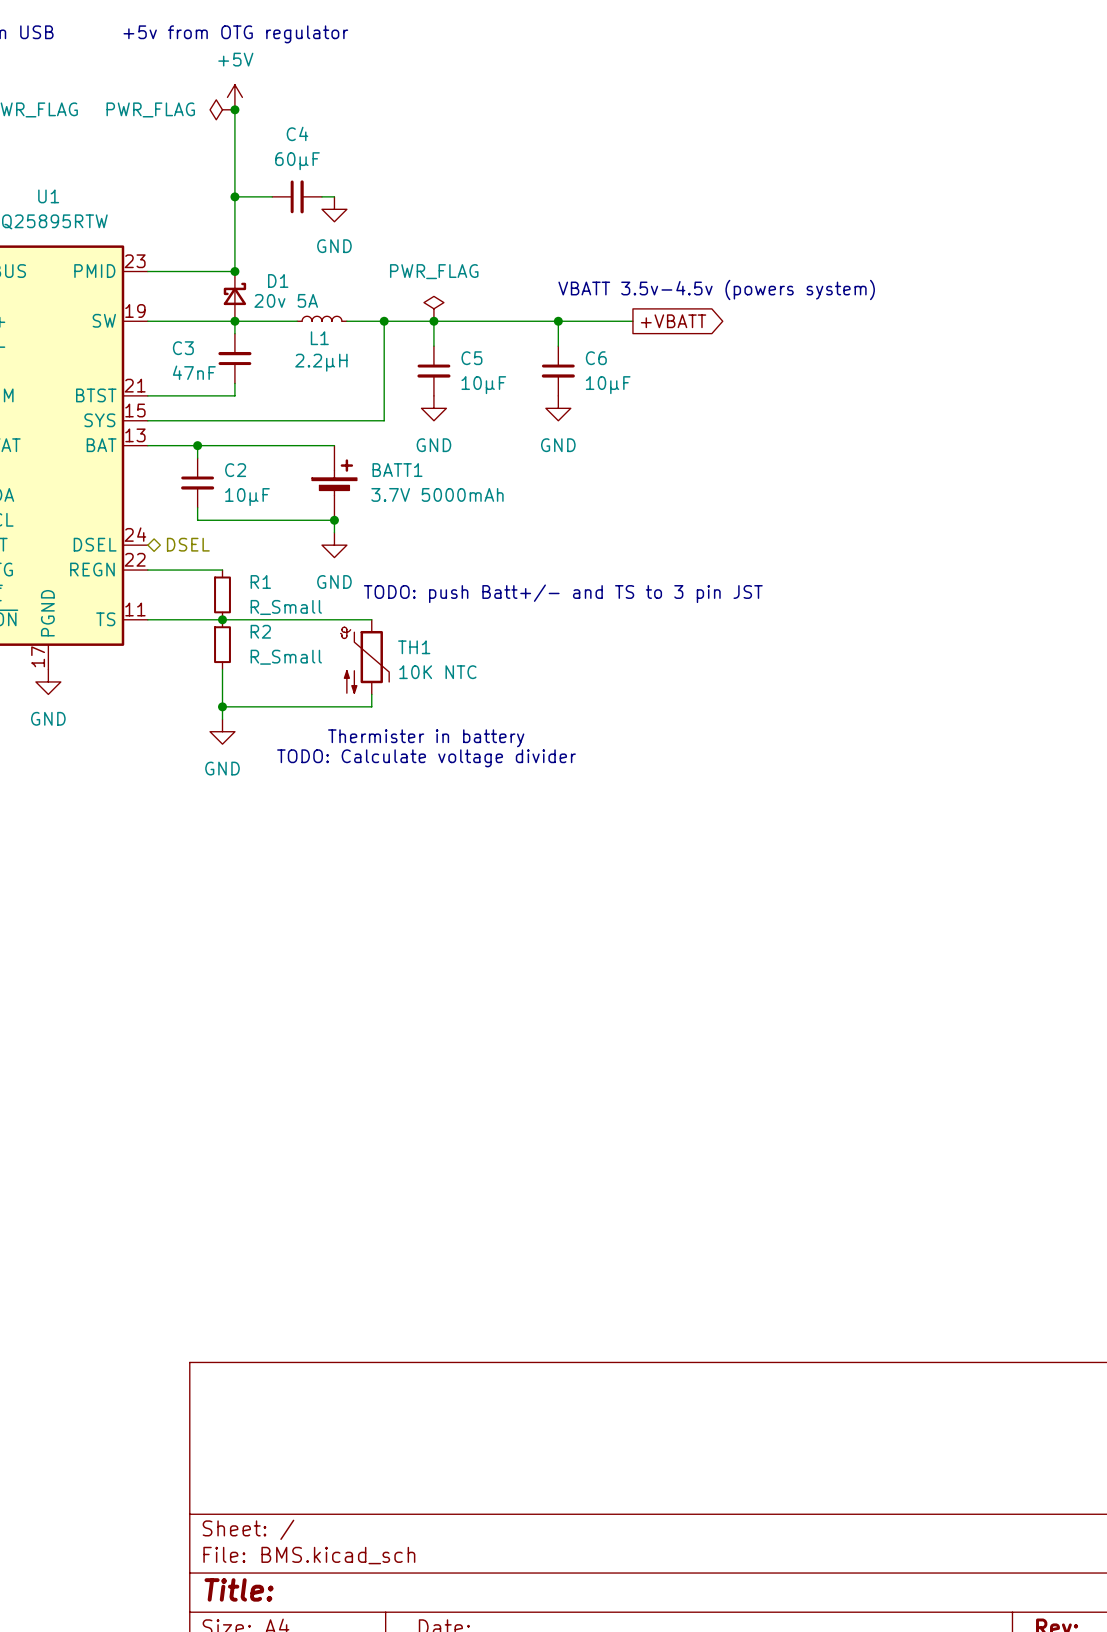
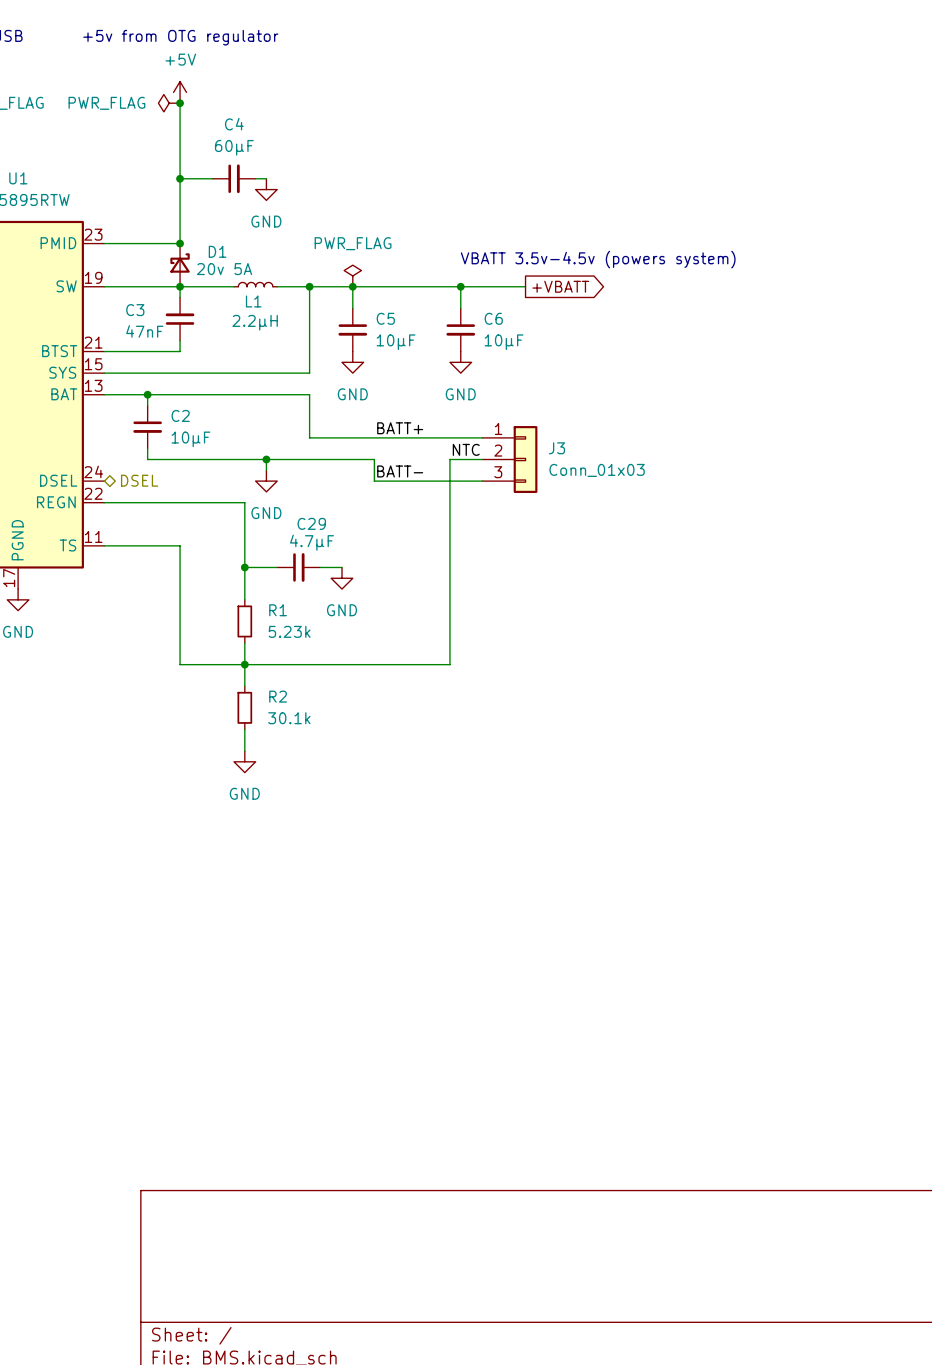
wire: none -> (266, 394) (309, 394) (309, 437) (482, 437)
BATT1: 3.7V 5000mAh (334, 482) -> none
label: none -> BATT+ (400, 428)
label: none -> NTC (466, 449)
wire: none -> (266, 459) (374, 459) (374, 481) (482, 481)
J3: none -> Conn_01x03 (509, 459)
label: none -> BATT- (400, 471)
wire: none -> (169, 502) (244, 502) (244, 599)
text: TODO: push Batt+/- and TS to 3 pin JST (563, 593) -> none
R1 position: (222, 594) -> (244, 621)
R1 value: R_Small (286, 607) -> 5.23k (289, 631)
junction: (222, 619) -> none
wire: (234, 619) (371, 619) -> (180, 545) (180, 664) (449, 664) (449, 459) (482, 459)
R2 position: (222, 644) -> (244, 707)
wire: none -> (244, 567) (277, 567)
junction: none -> (244, 567)
C29: none -> 4.7μF (298, 567)
wire: none -> (320, 567) (341, 567)
R2 value: R_Small (286, 657) -> 30.1k (289, 718)
TH1: 10K NTC (364, 657) -> none
power symbol: none -> GND (341, 578)
wire: (222, 669) (222, 719) -> (244, 643) (244, 686)
wire: (371, 694) (371, 706) (222, 706) -> none
junction: (222, 706) -> none
power symbol: GND (222, 731) -> none
text: Thermister in battery (426, 738) -> none
junction: none -> (244, 664)
text: TODO: Calculate voltage divider (426, 758) -> none
wire: none -> (244, 729) (244, 751)
power symbol: none -> GND (244, 761)

